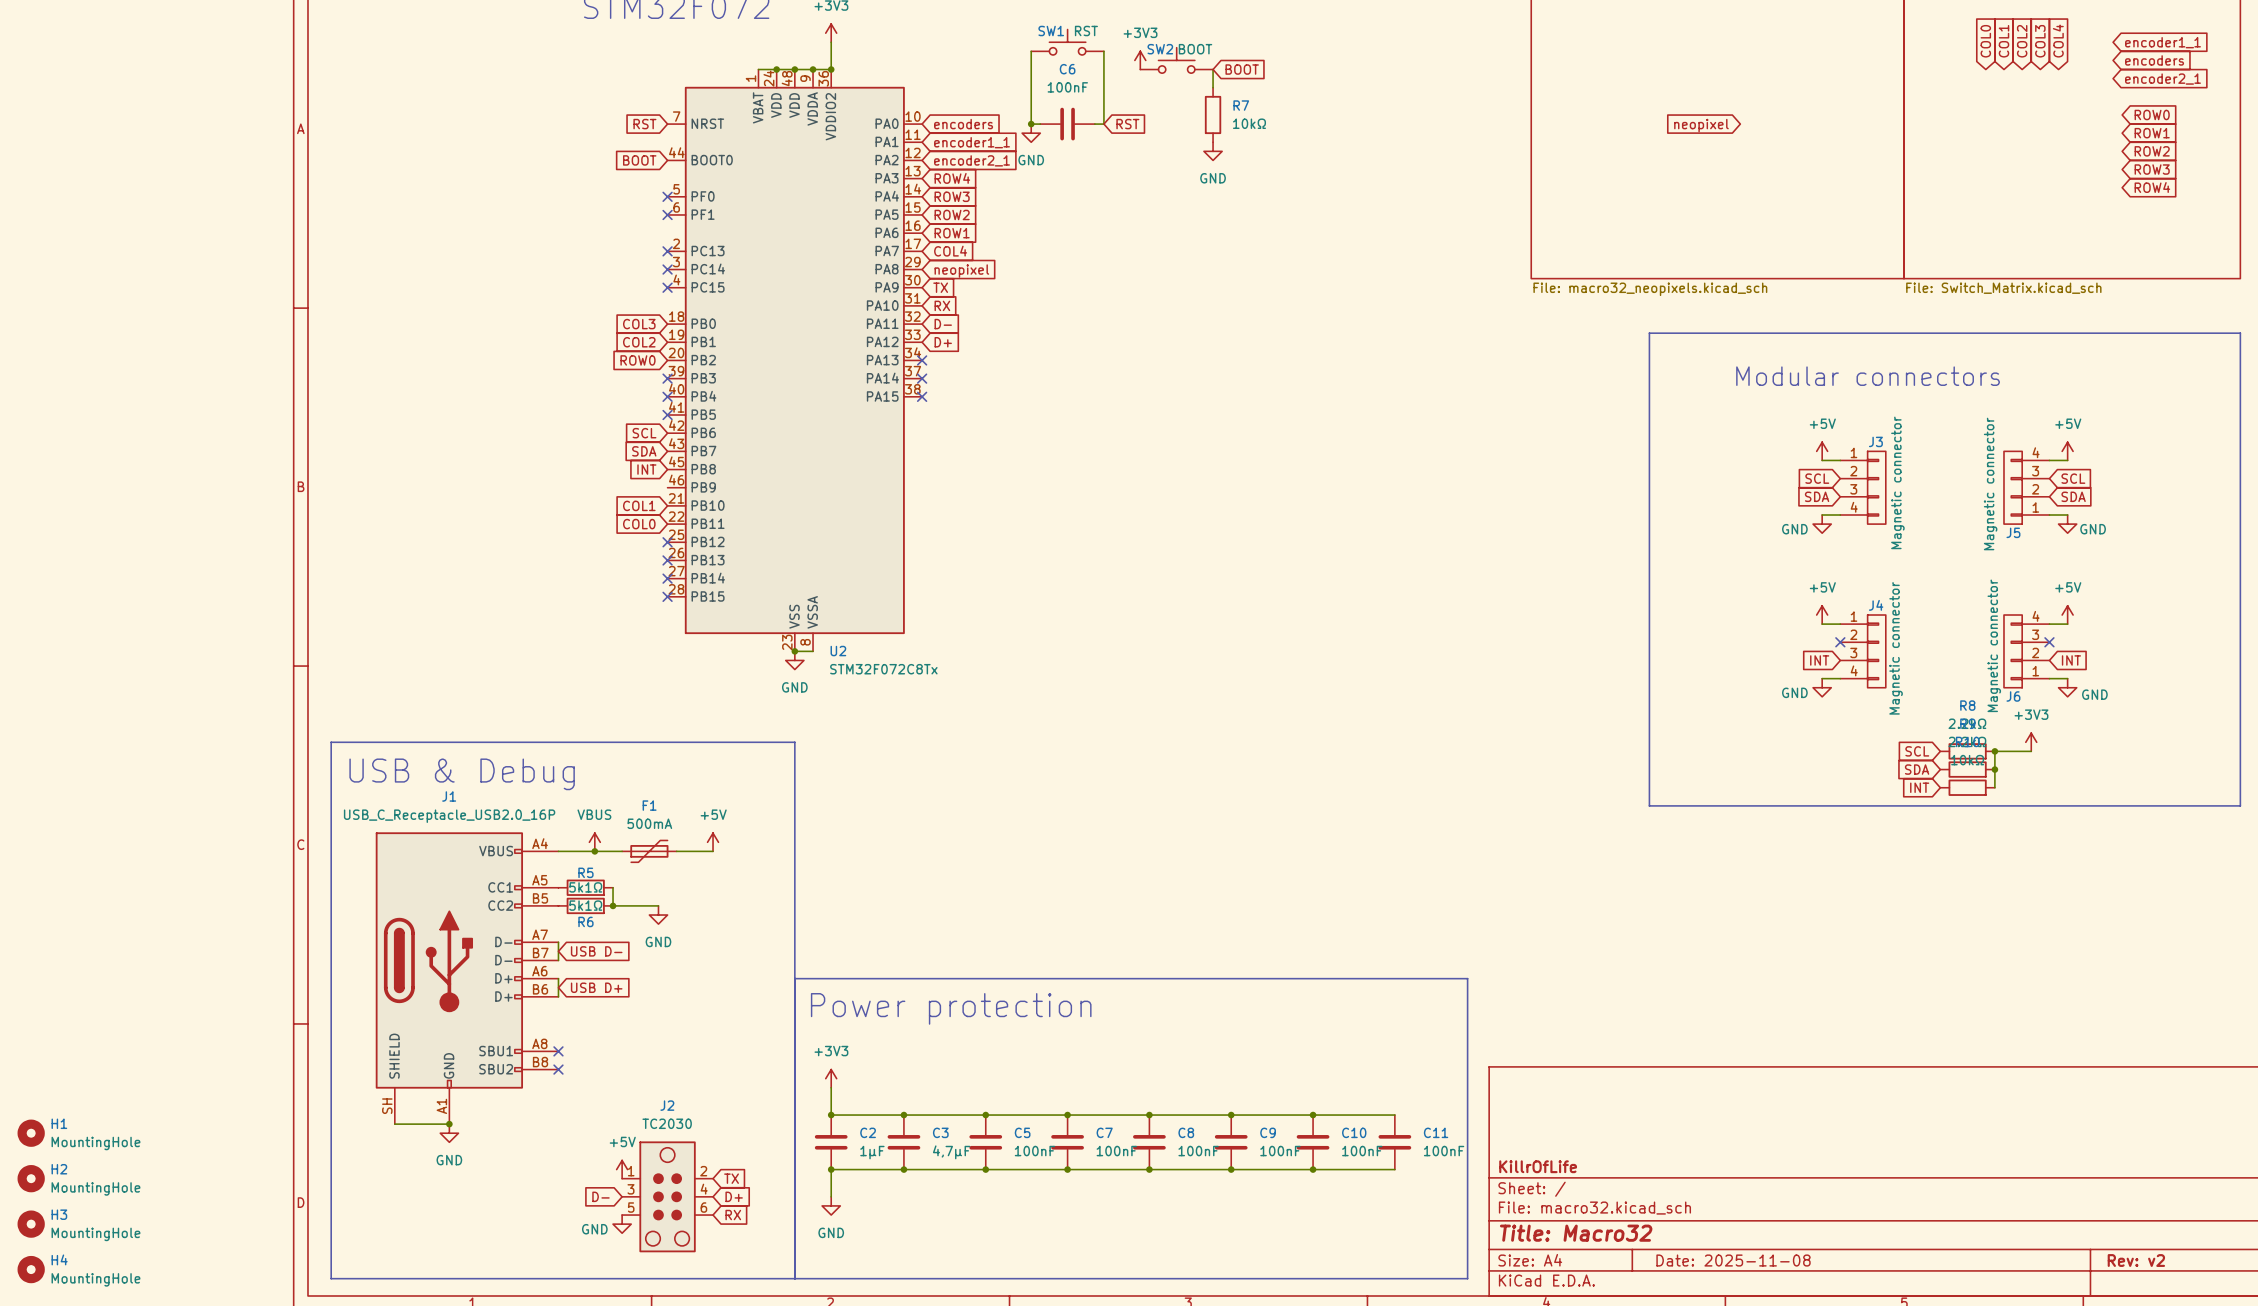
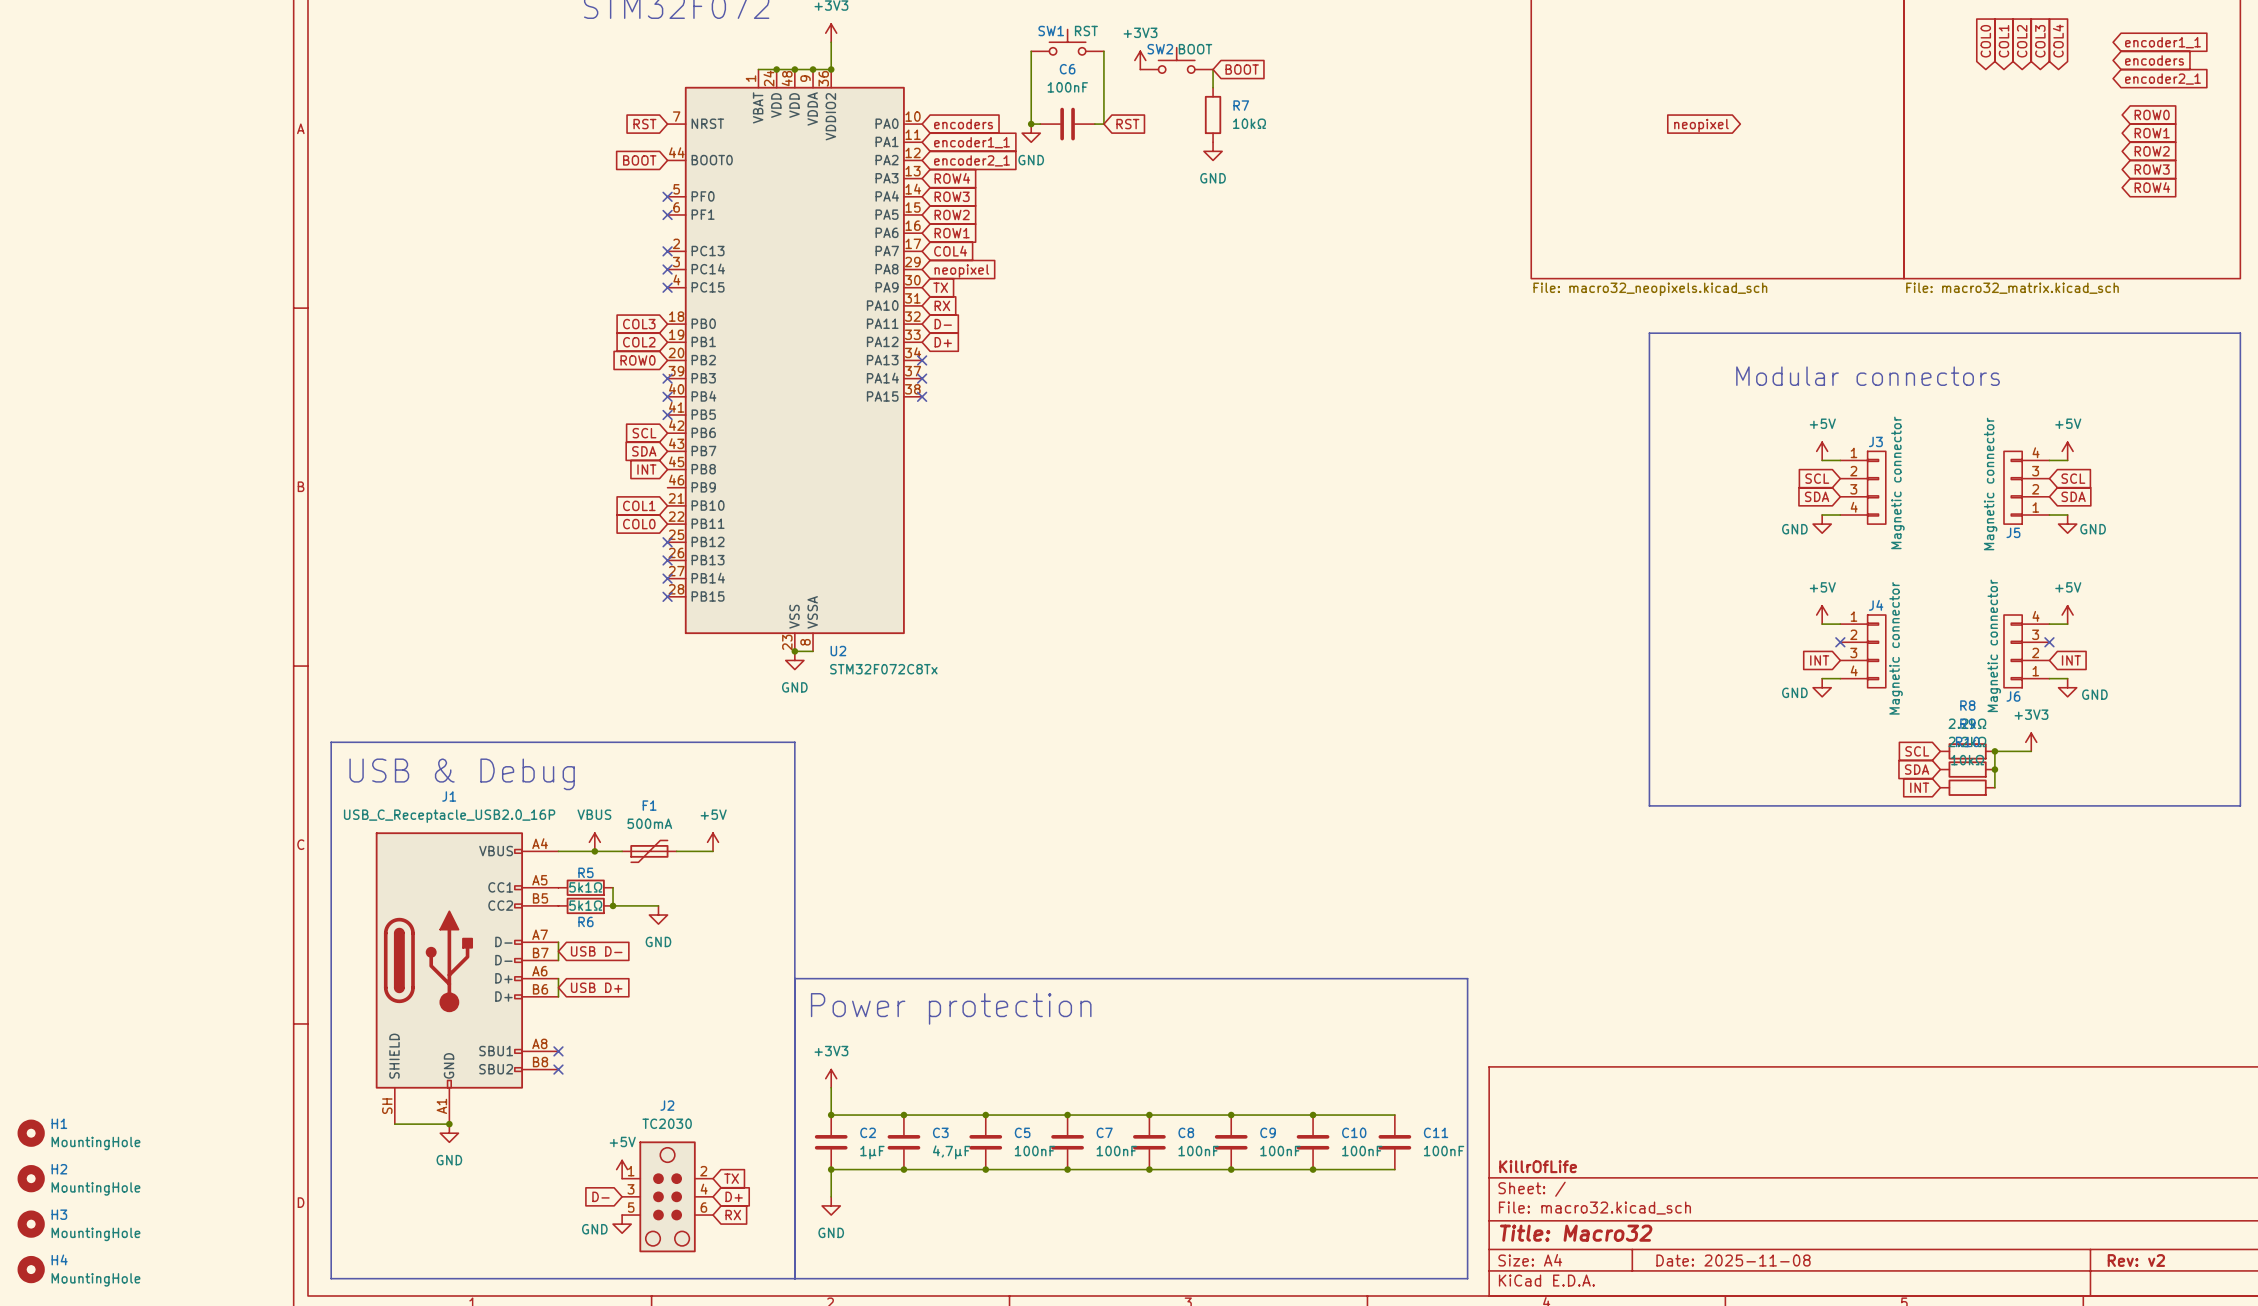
sheet value: File: Switch_Matrix.kicad_sch (2003, 288) -> File: macro32_matrix.kicad_sch (2012, 288)

